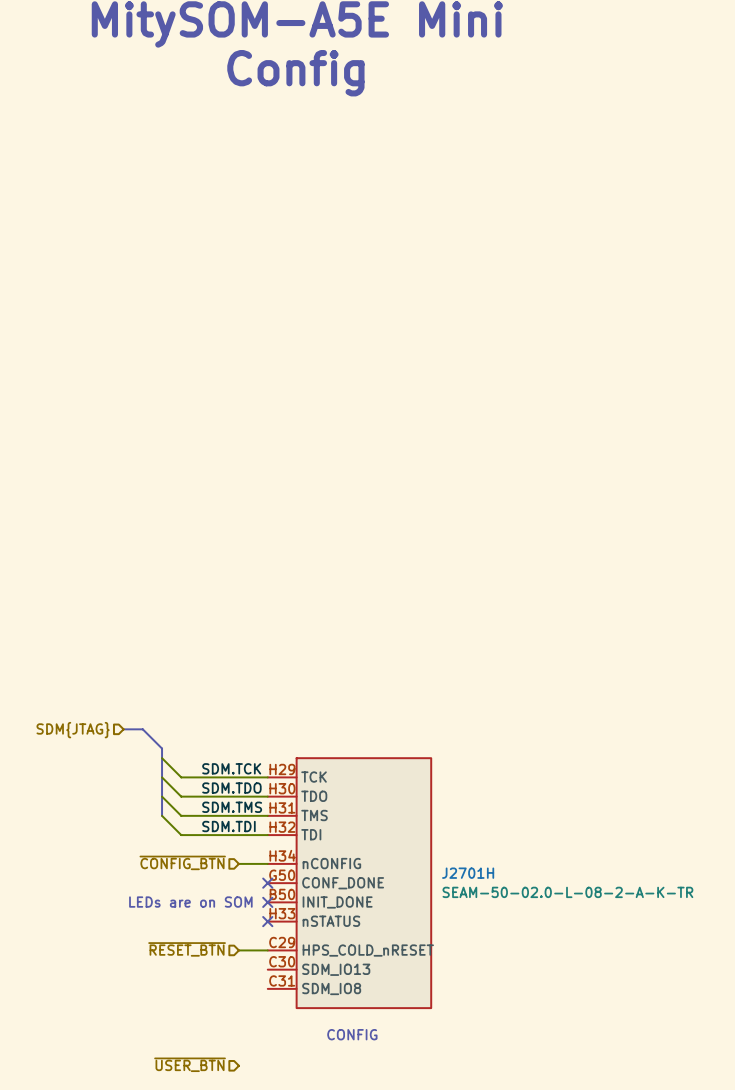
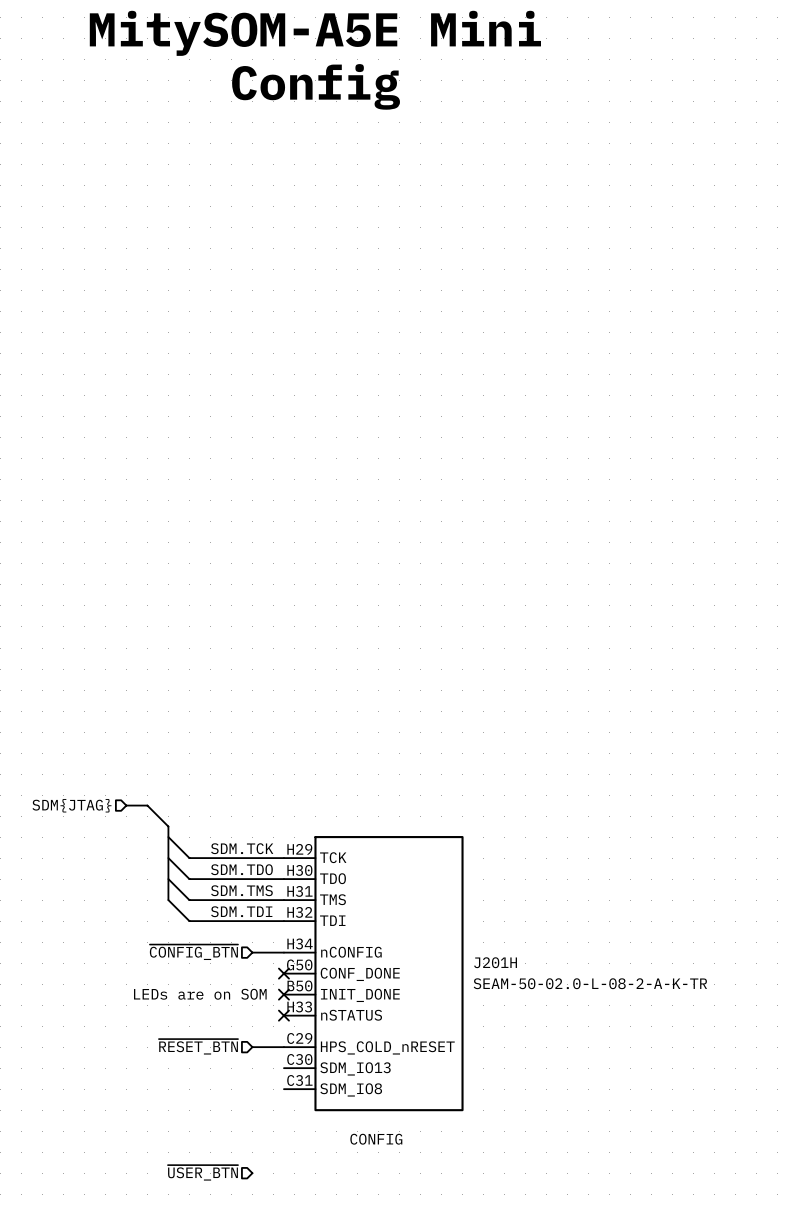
J2701H name: J2701H (468, 873) -> J201H (495, 962)

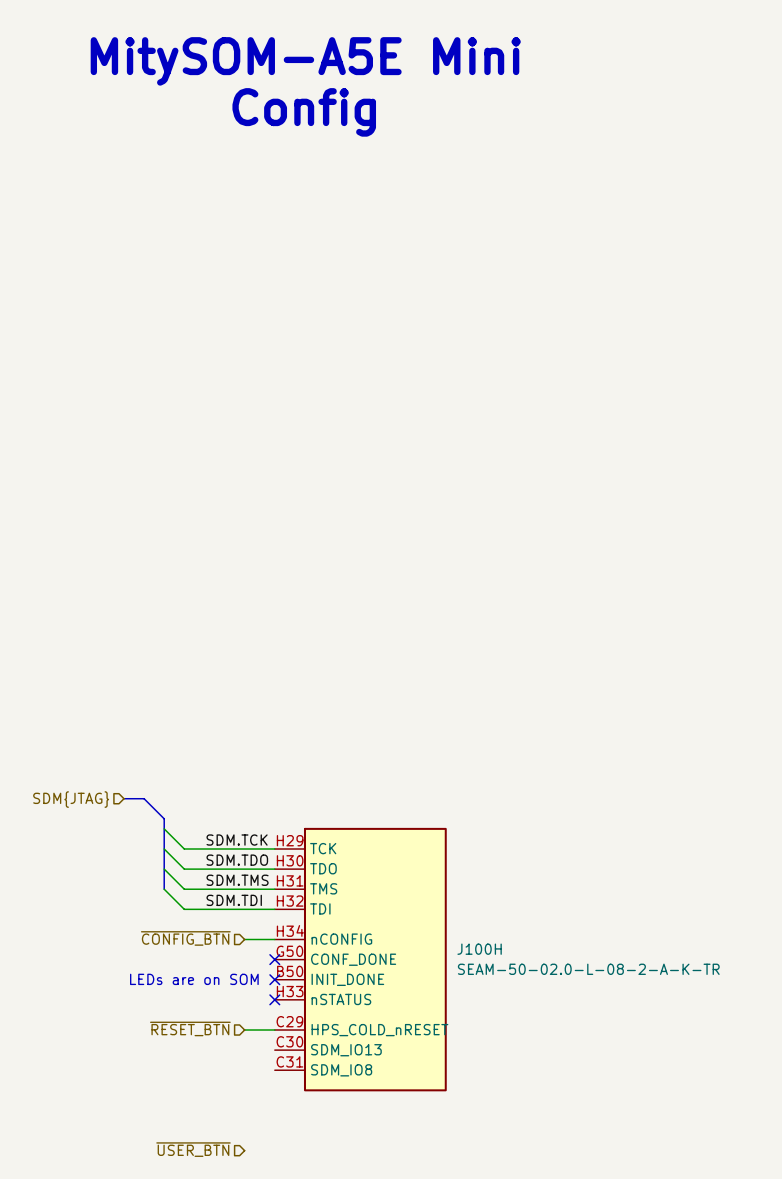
J201H name: J201H (495, 962) -> J100H (479, 949)
text: CONFIG (376, 1139) -> none

